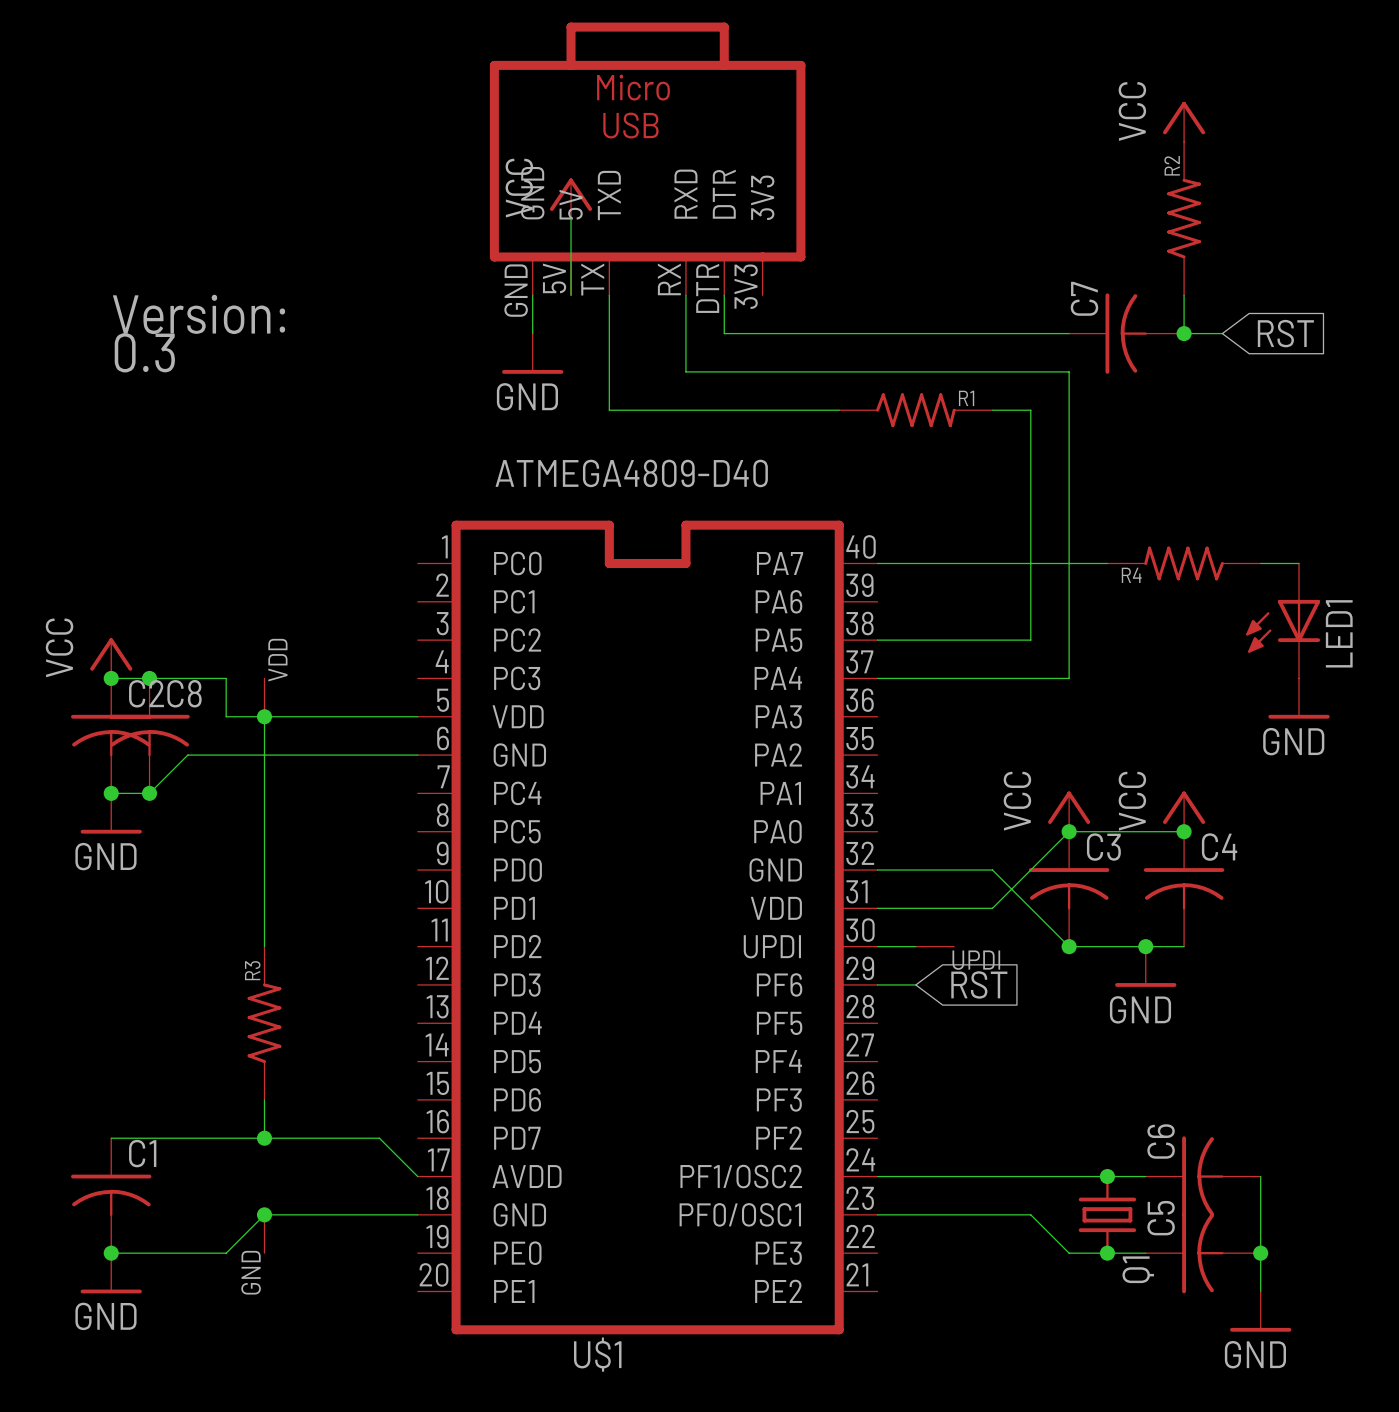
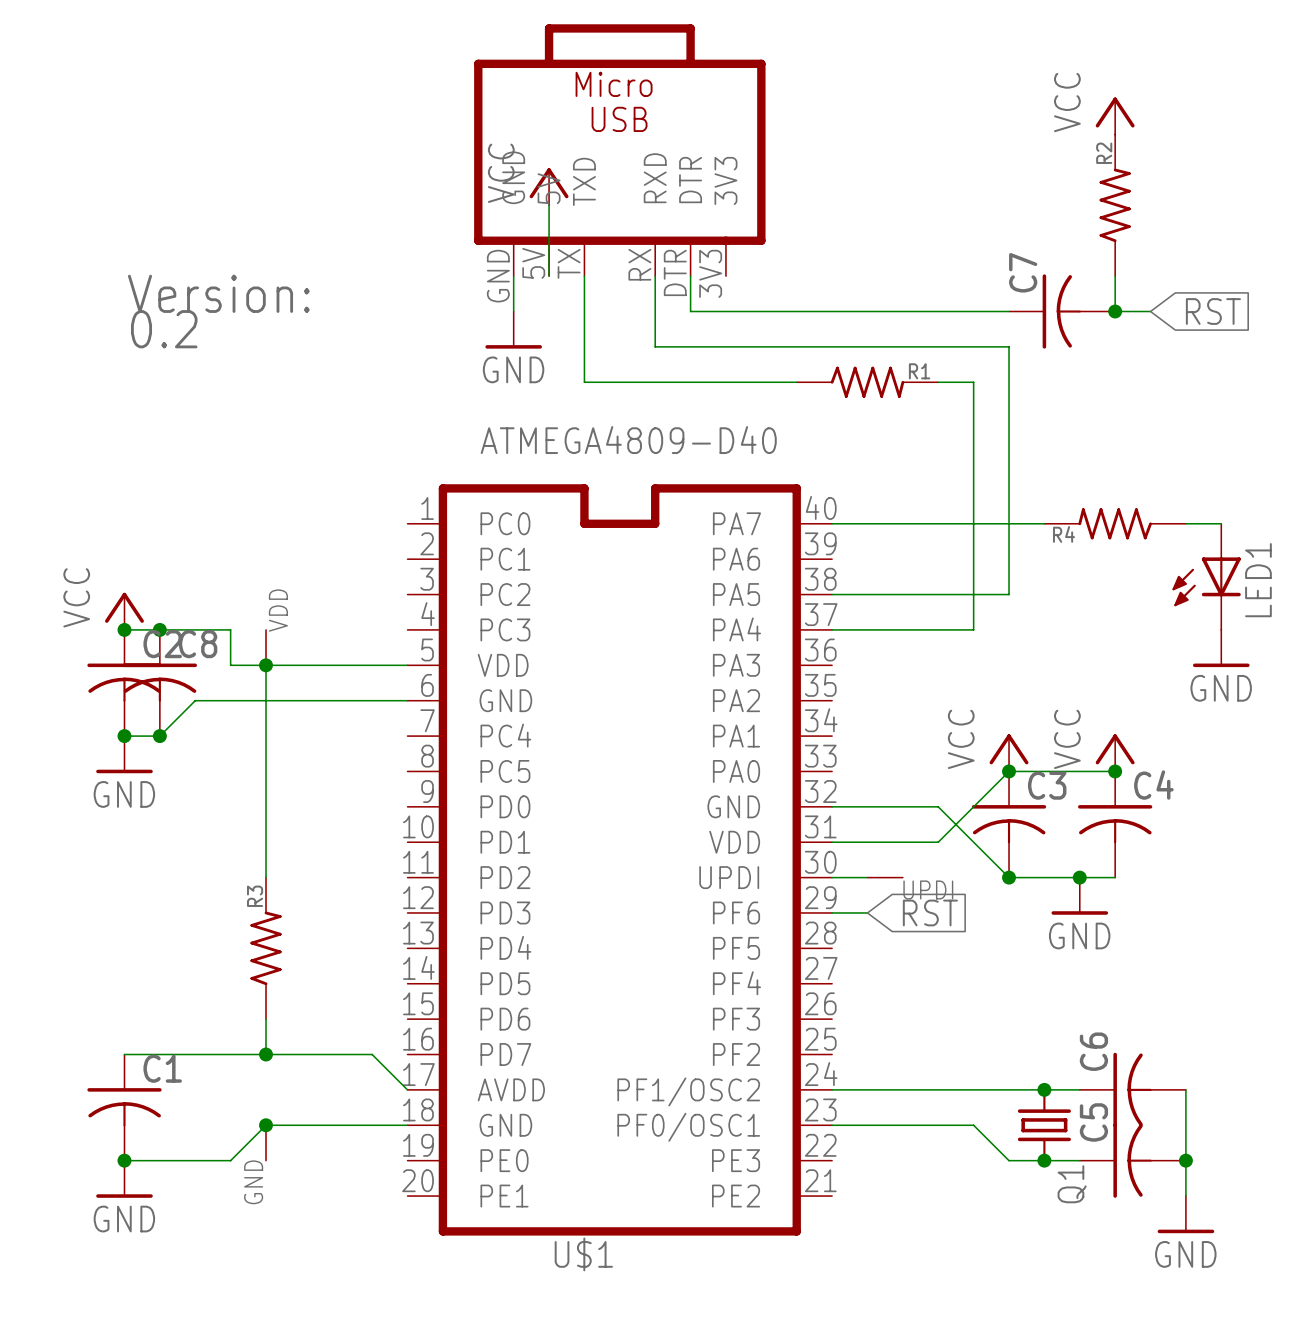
part value: 0.3 (144, 352) -> 0.2 (164, 329)
wire: (1069, 640) (1069, 678) (1030, 678) -> (1009, 594) (973, 594) (973, 629)

